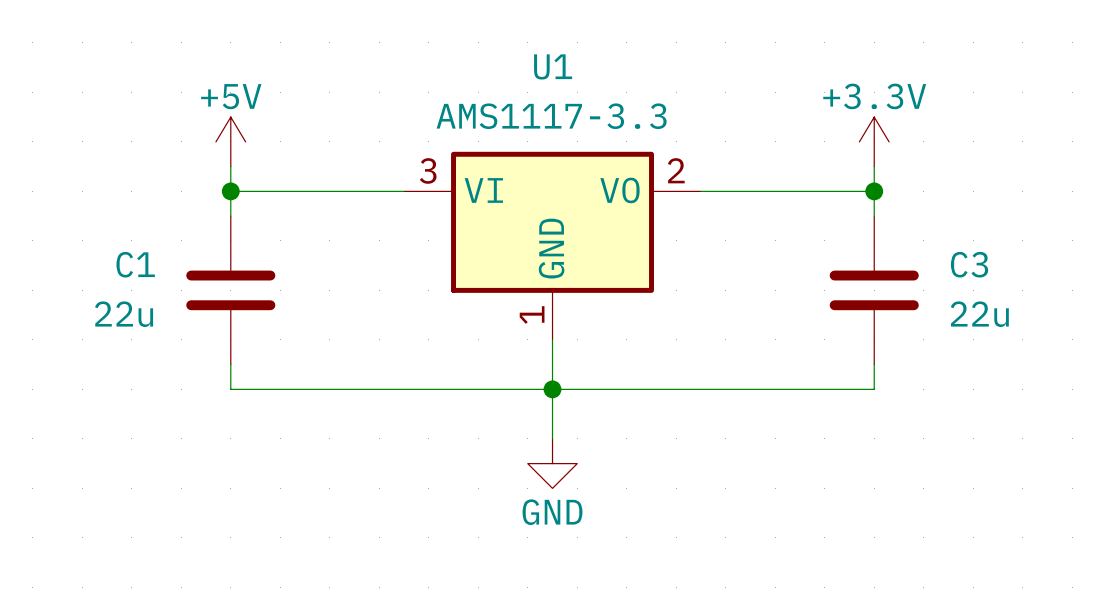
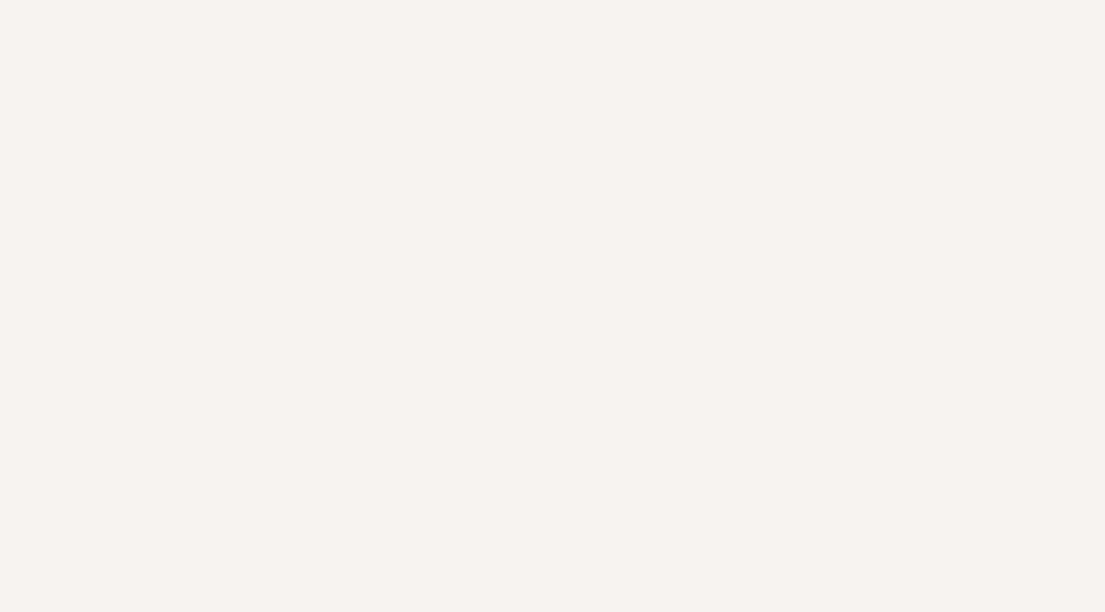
power symbol: +5V (230, 141) -> none
power symbol: +3.3V (874, 141) -> none
wire: (230, 166) (230, 216) -> none
wire: (874, 166) (874, 216) -> none
wire: (230, 191) (404, 191) -> none
junction: (230, 191) -> none
wire: (701, 191) (874, 191) -> none
junction: (874, 191) -> none
U1: AMS1117-3.3 (552, 245) -> none
C1: 22u (230, 290) -> none
C3: 22u (874, 290) -> none
wire: (552, 339) (552, 438) -> none
wire: (230, 364) (230, 389) (874, 389) (874, 364) -> none
junction: (552, 389) -> none
power symbol: GND (552, 463) -> none

